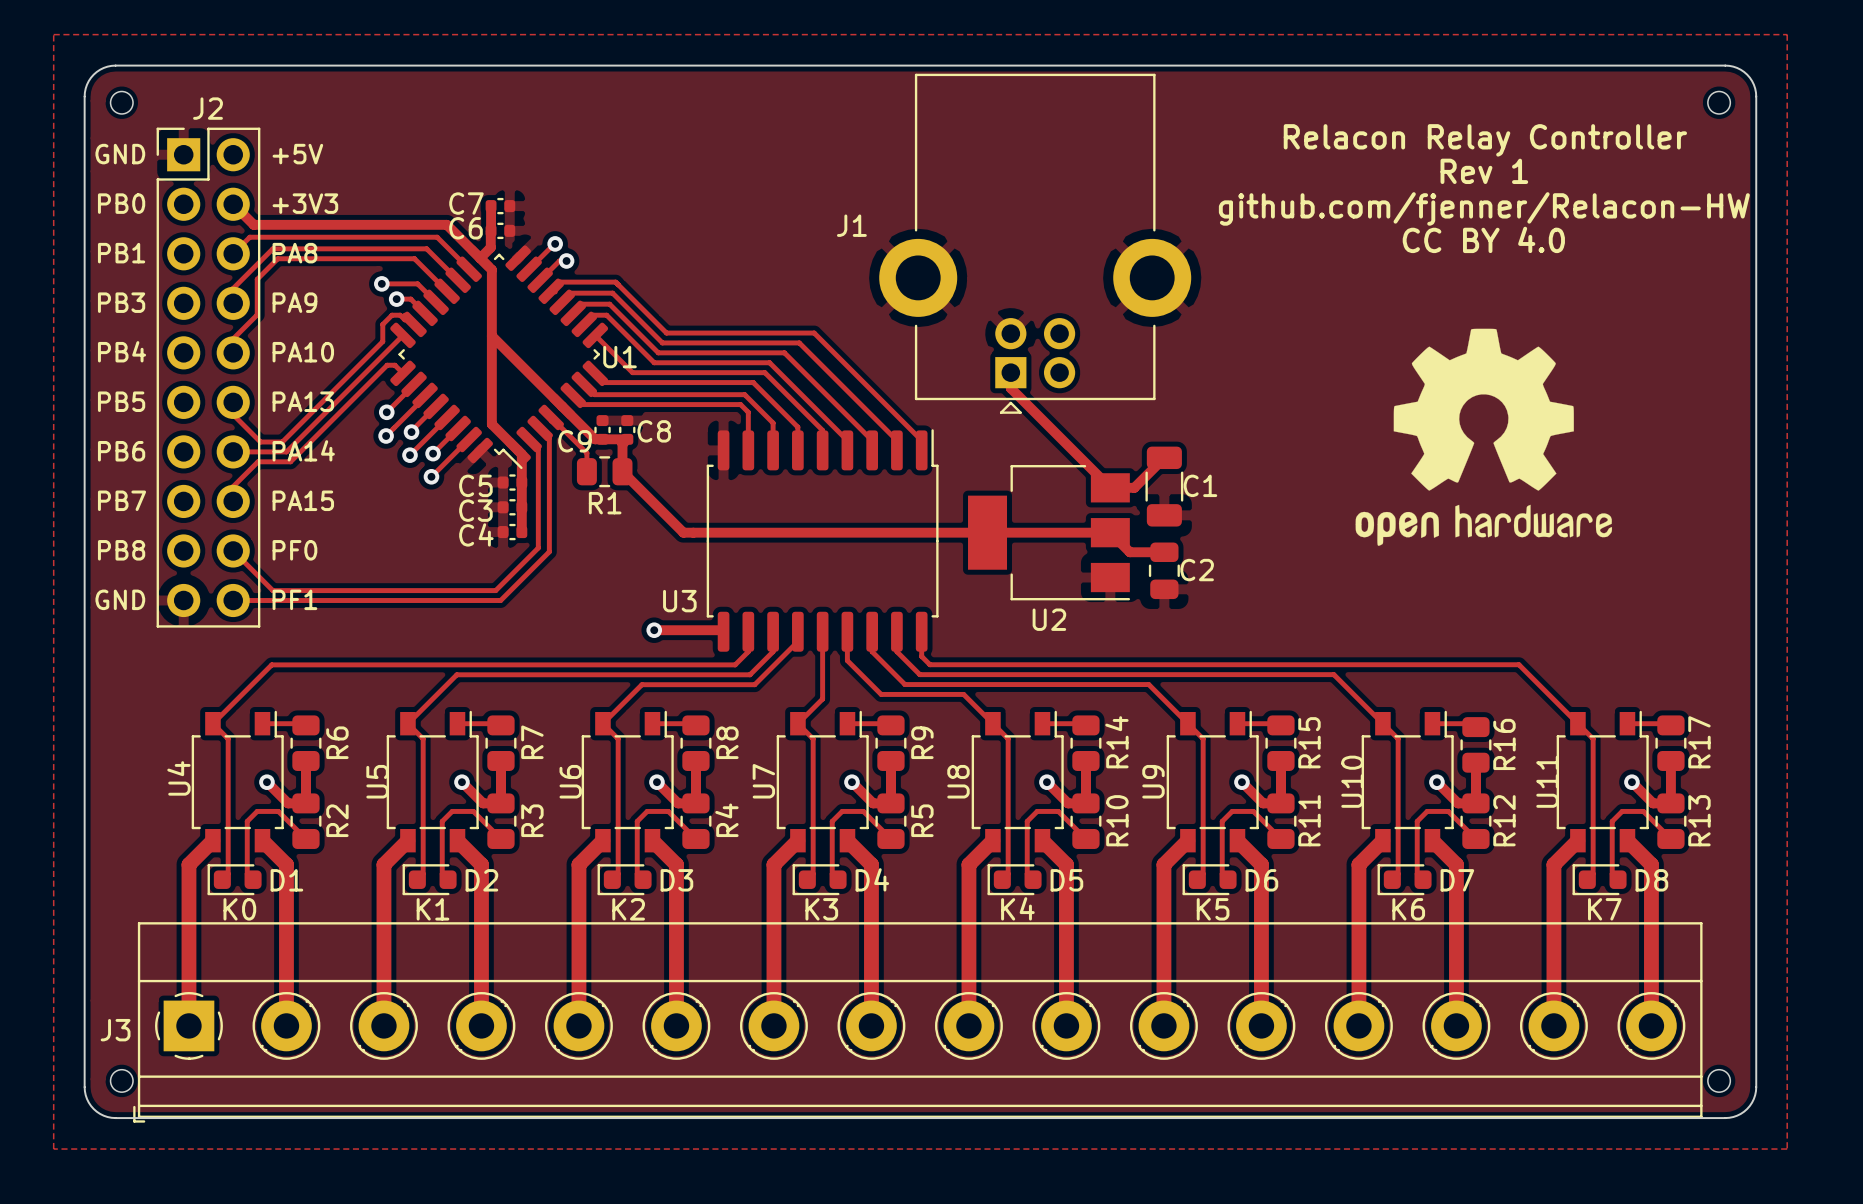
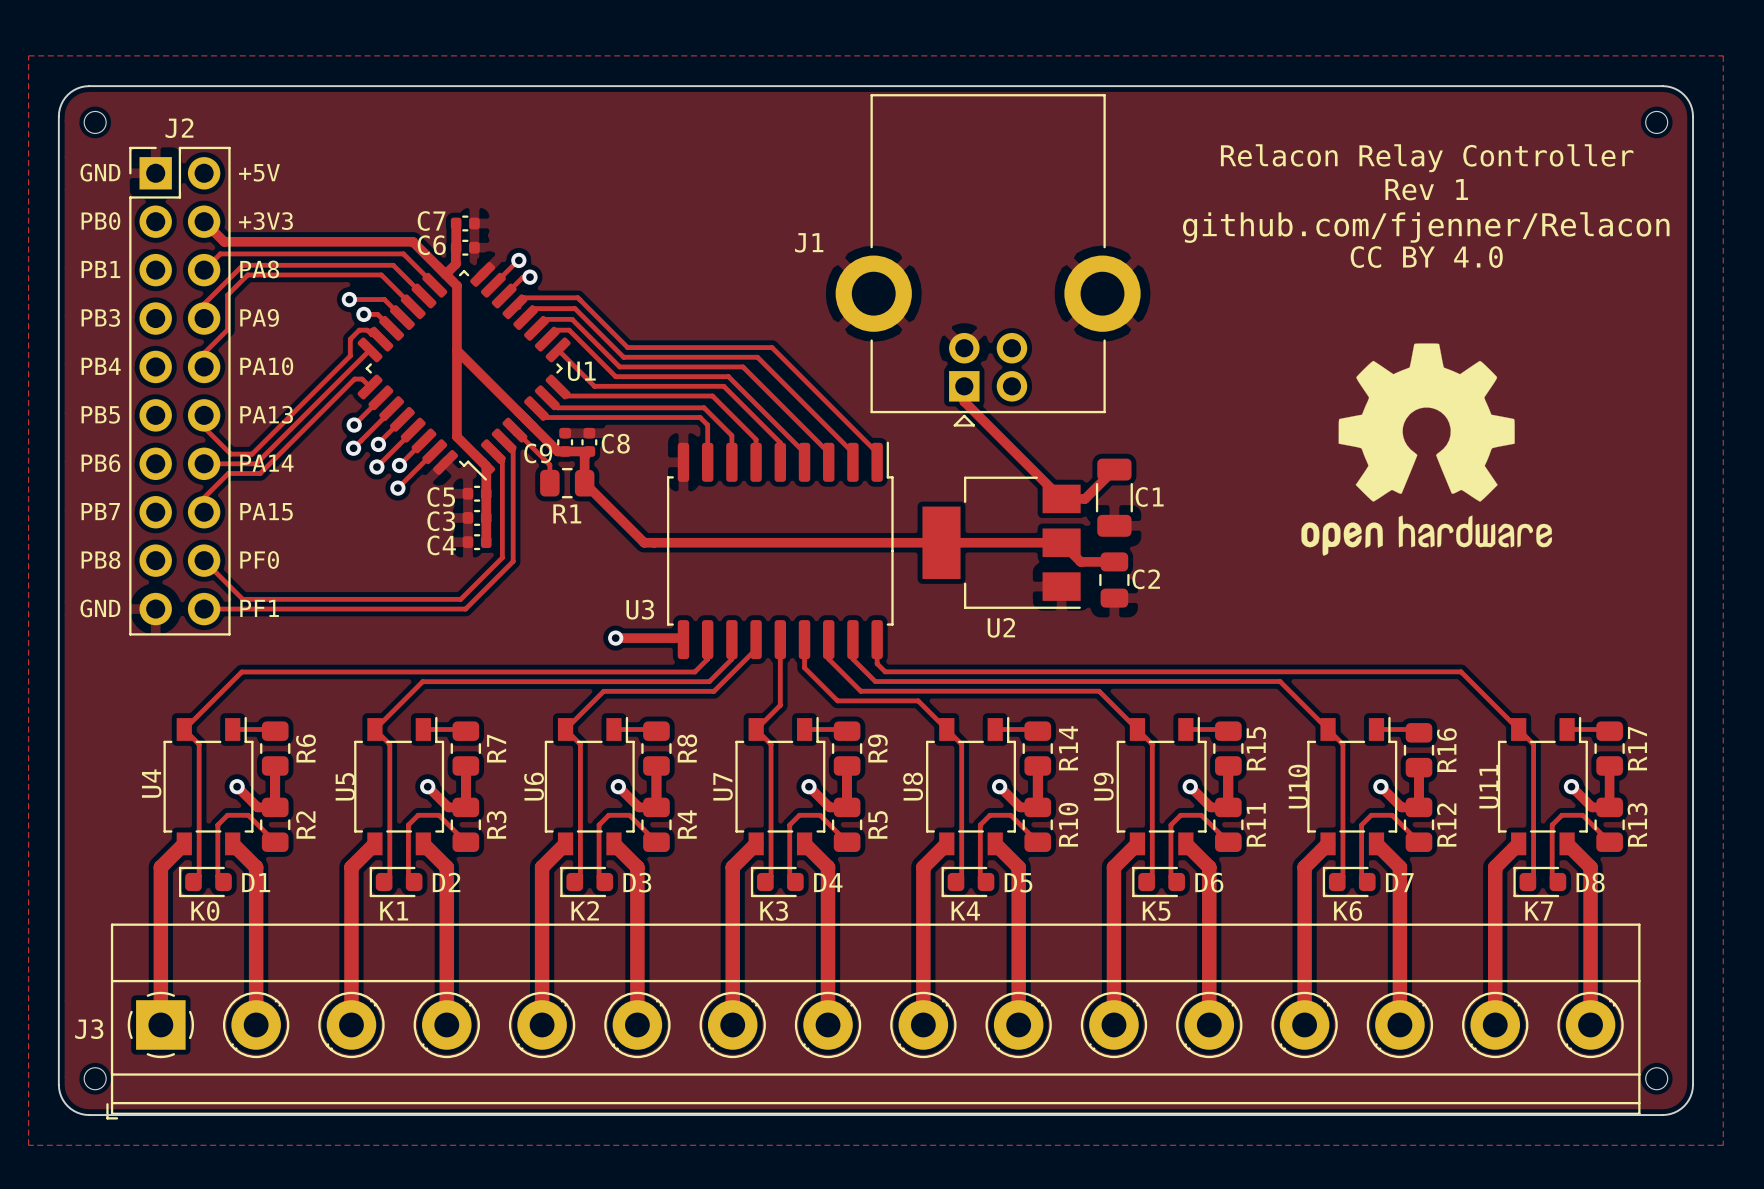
text: github.com/fjenner/Relacon-HW (1484, 208) -> github.com/fjenner/Relacon (1426, 227)

